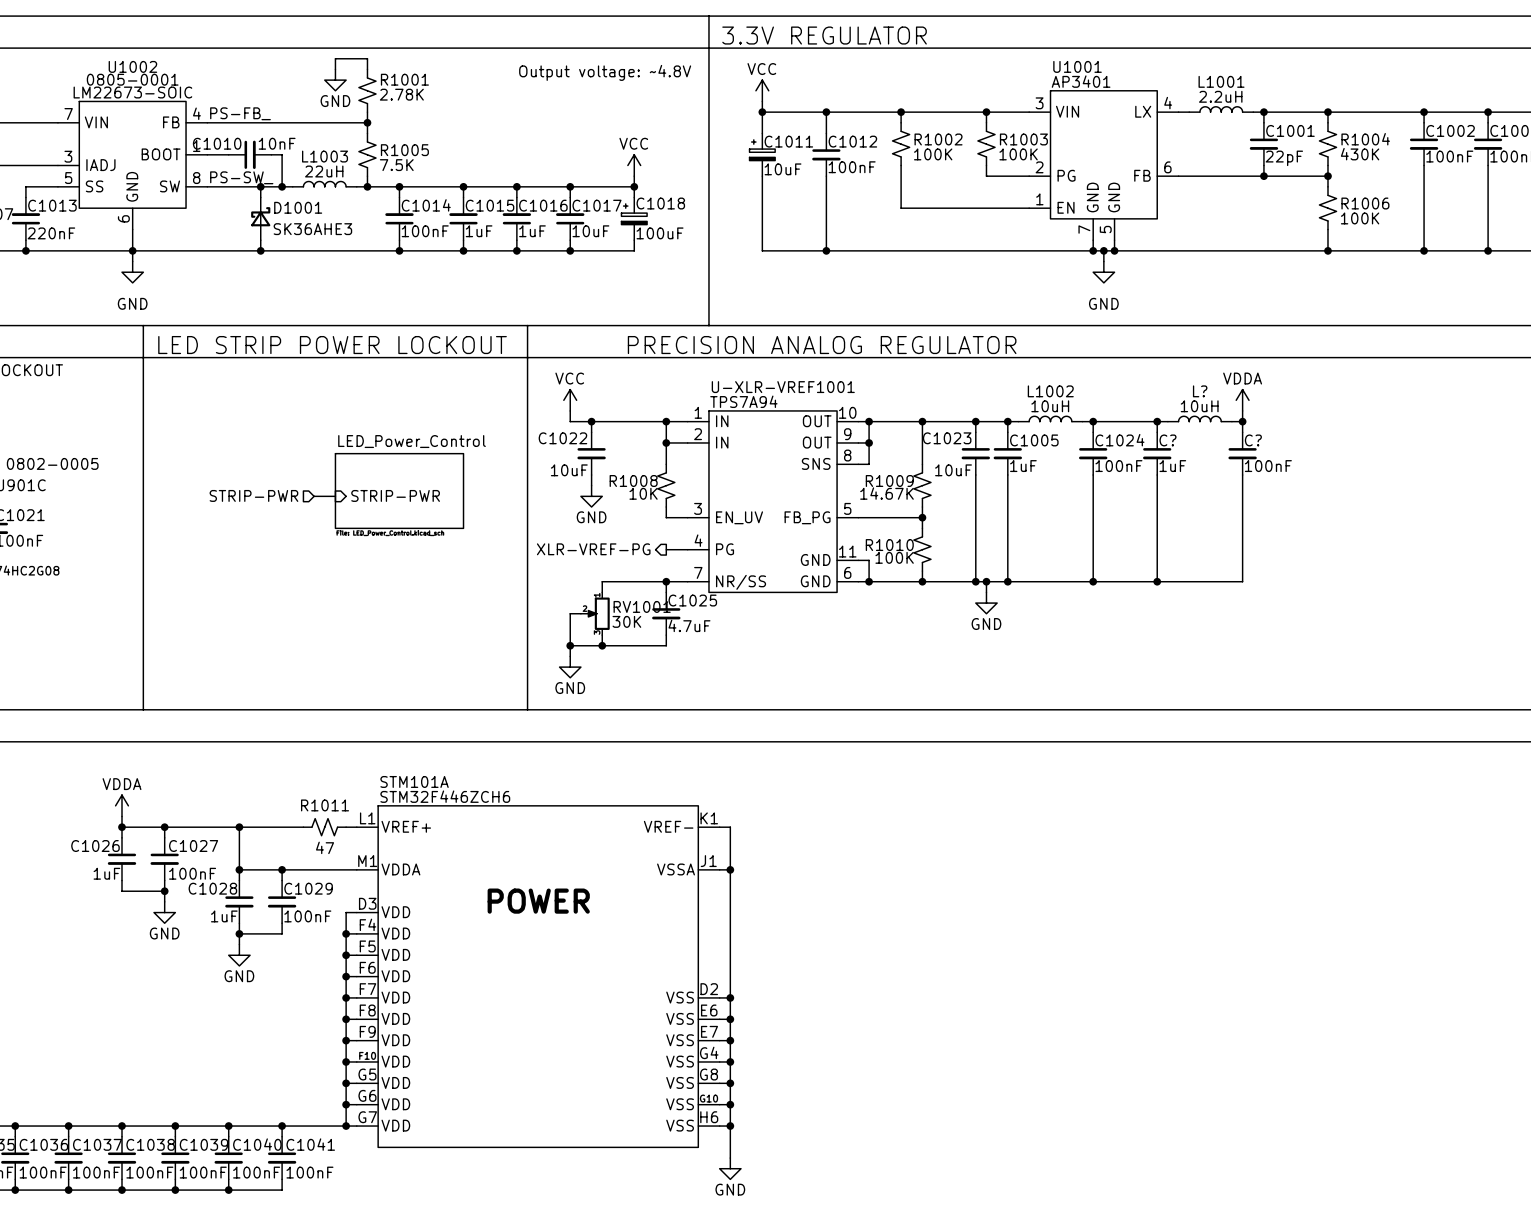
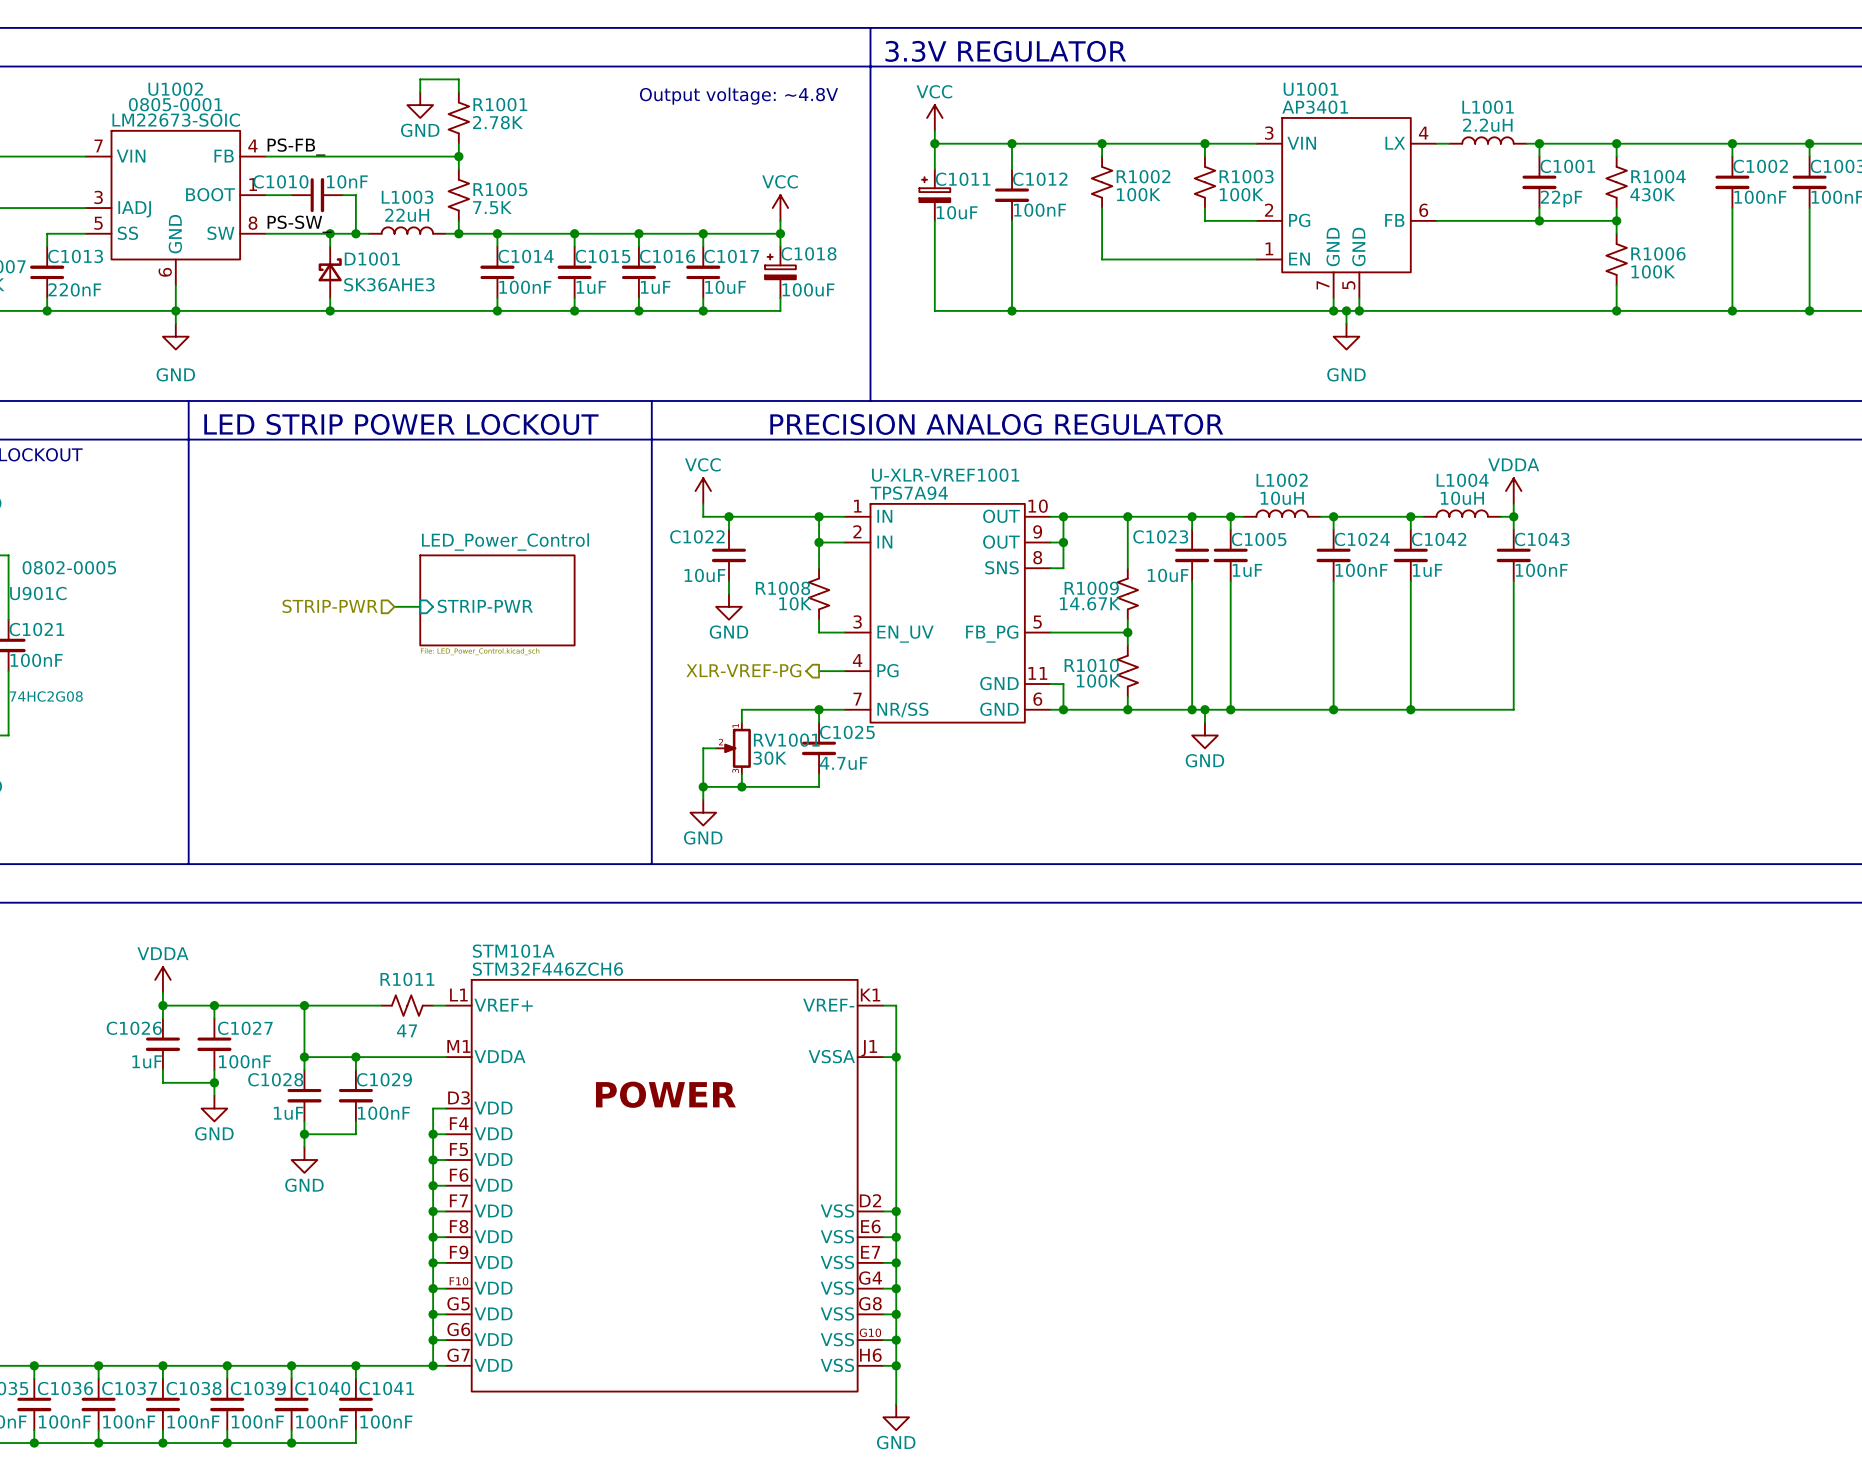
L? name: L? (1200, 391) -> L1004 (1462, 480)
C? name: C? (1167, 440) -> C1042 (1439, 539)
C? name: C? (1253, 440) -> C1043 (1542, 539)

